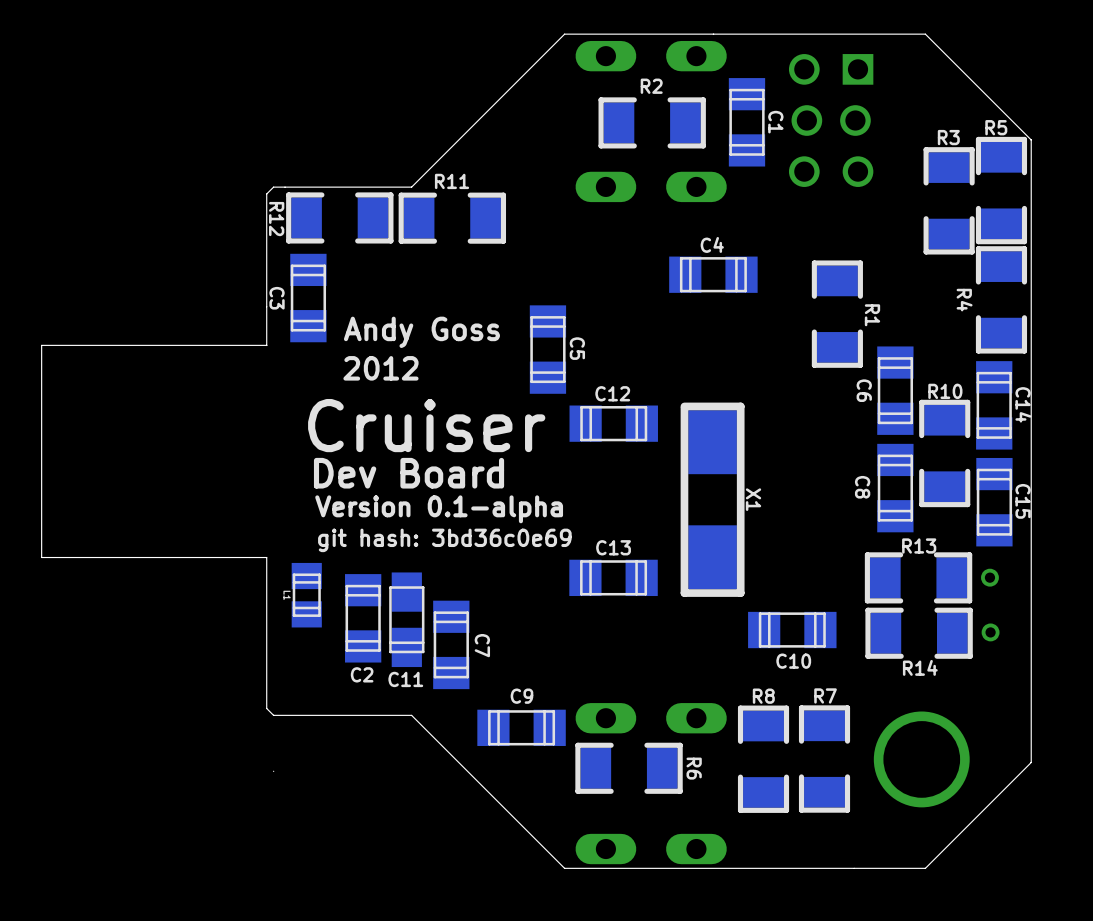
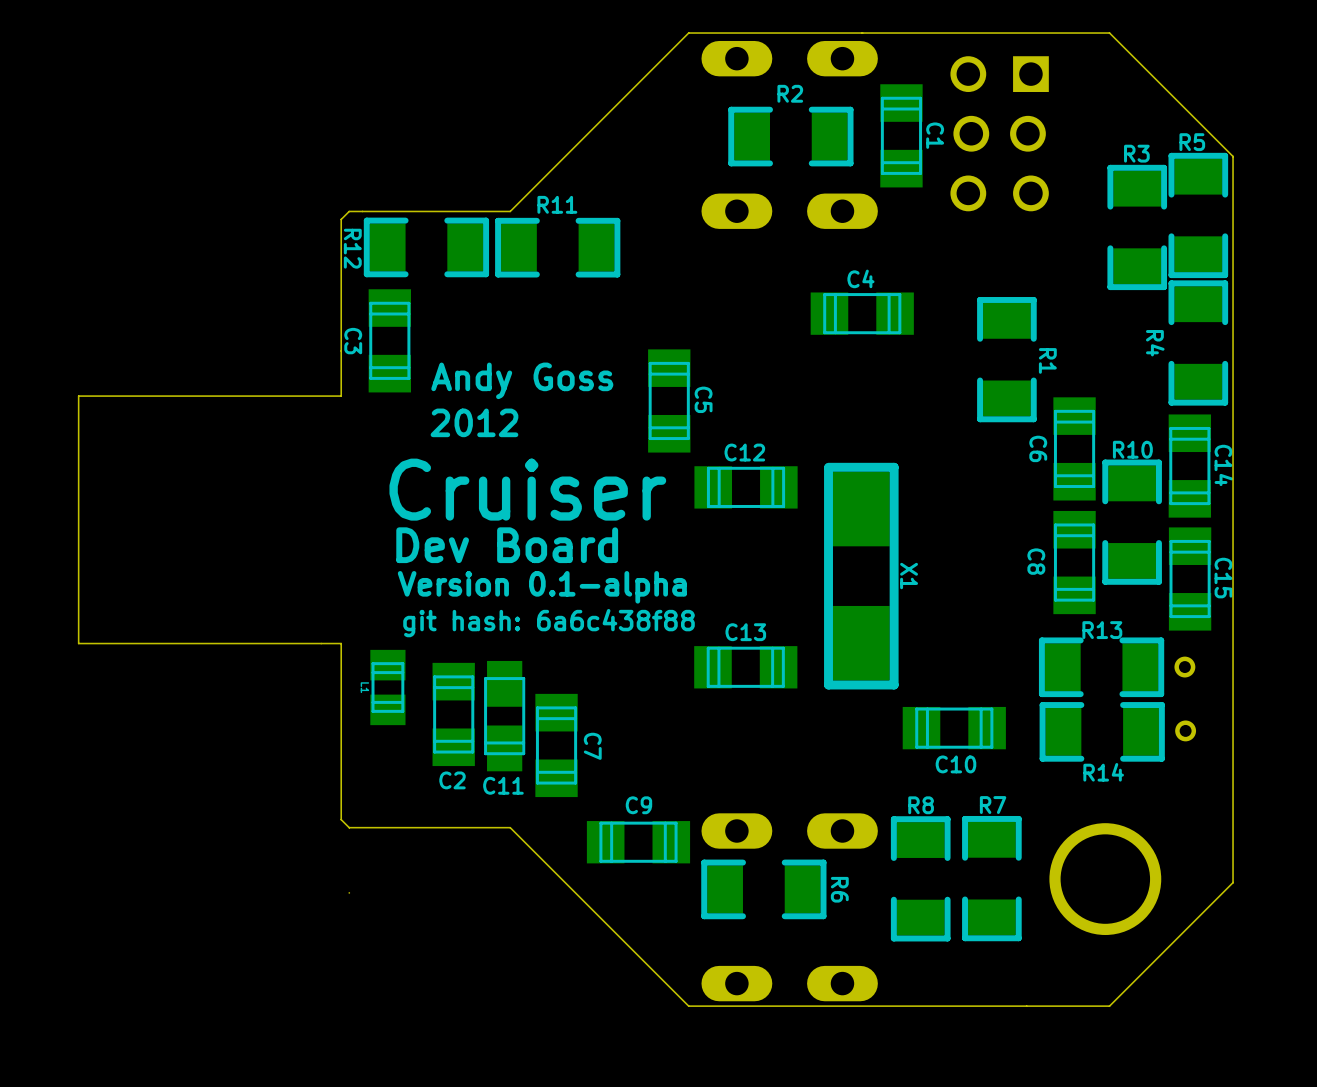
text: git hash: 3bd36c0e69 (444, 540) -> git hash: 6a6c438f88 (549, 623)

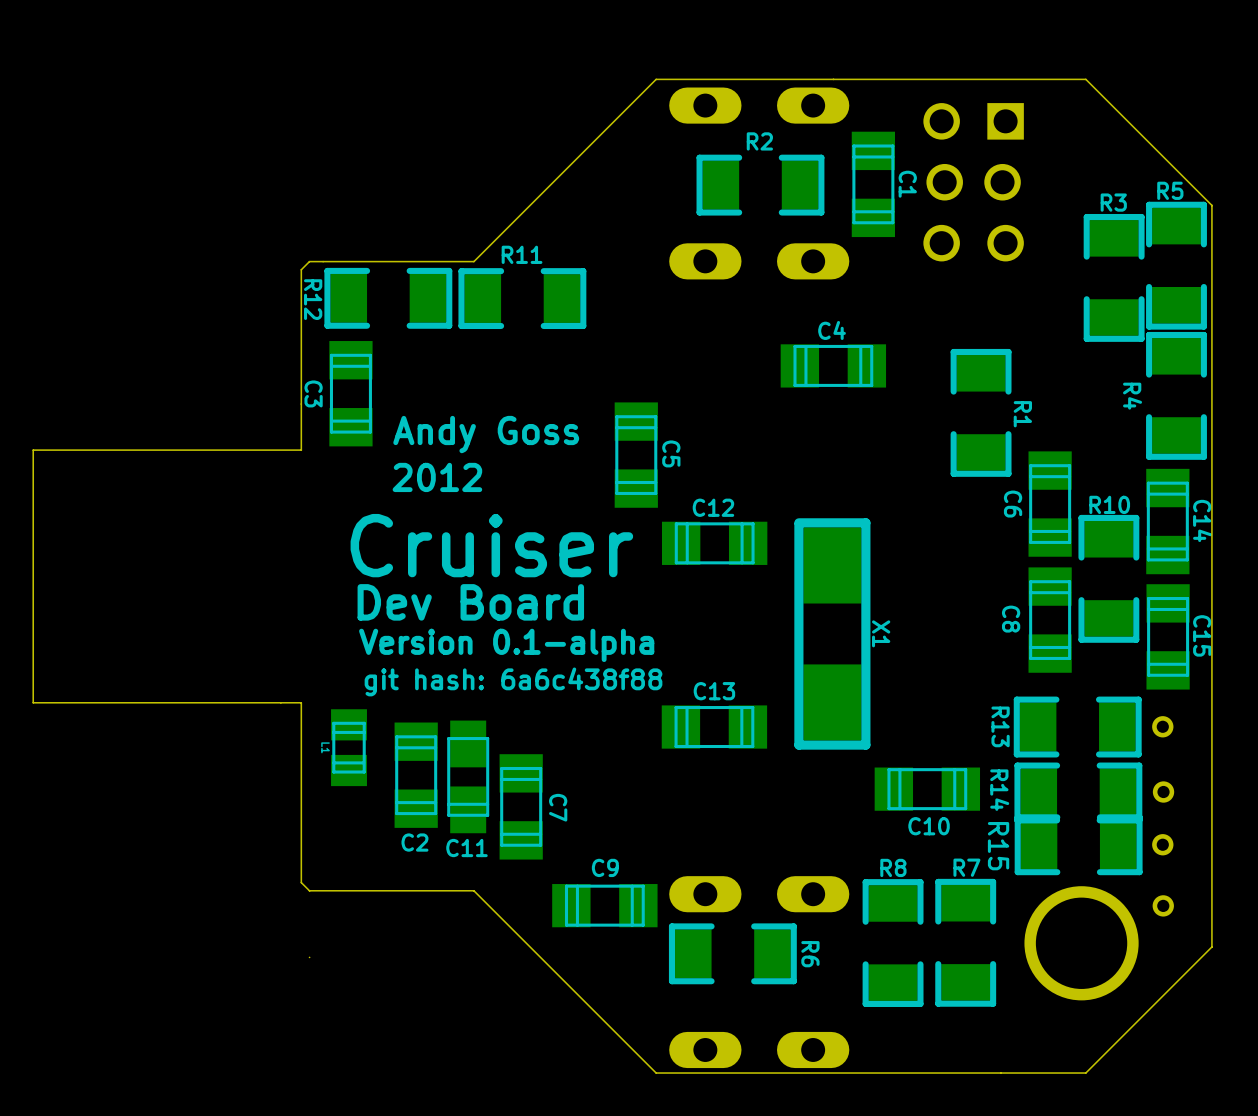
R13 name rotation: 0° (1102, 630) -> 90° clockwise (1000, 726)
R13 name position: R13 (1102, 630) -> R13 (1000, 726)
R14 name rotation: 0° (1103, 772) -> 90° clockwise (999, 790)
R14 name position: R14 (1103, 772) -> R14 (999, 790)
R15: none -> (1078, 844)
part: none -> (1162, 844)
part: none -> (1163, 905)

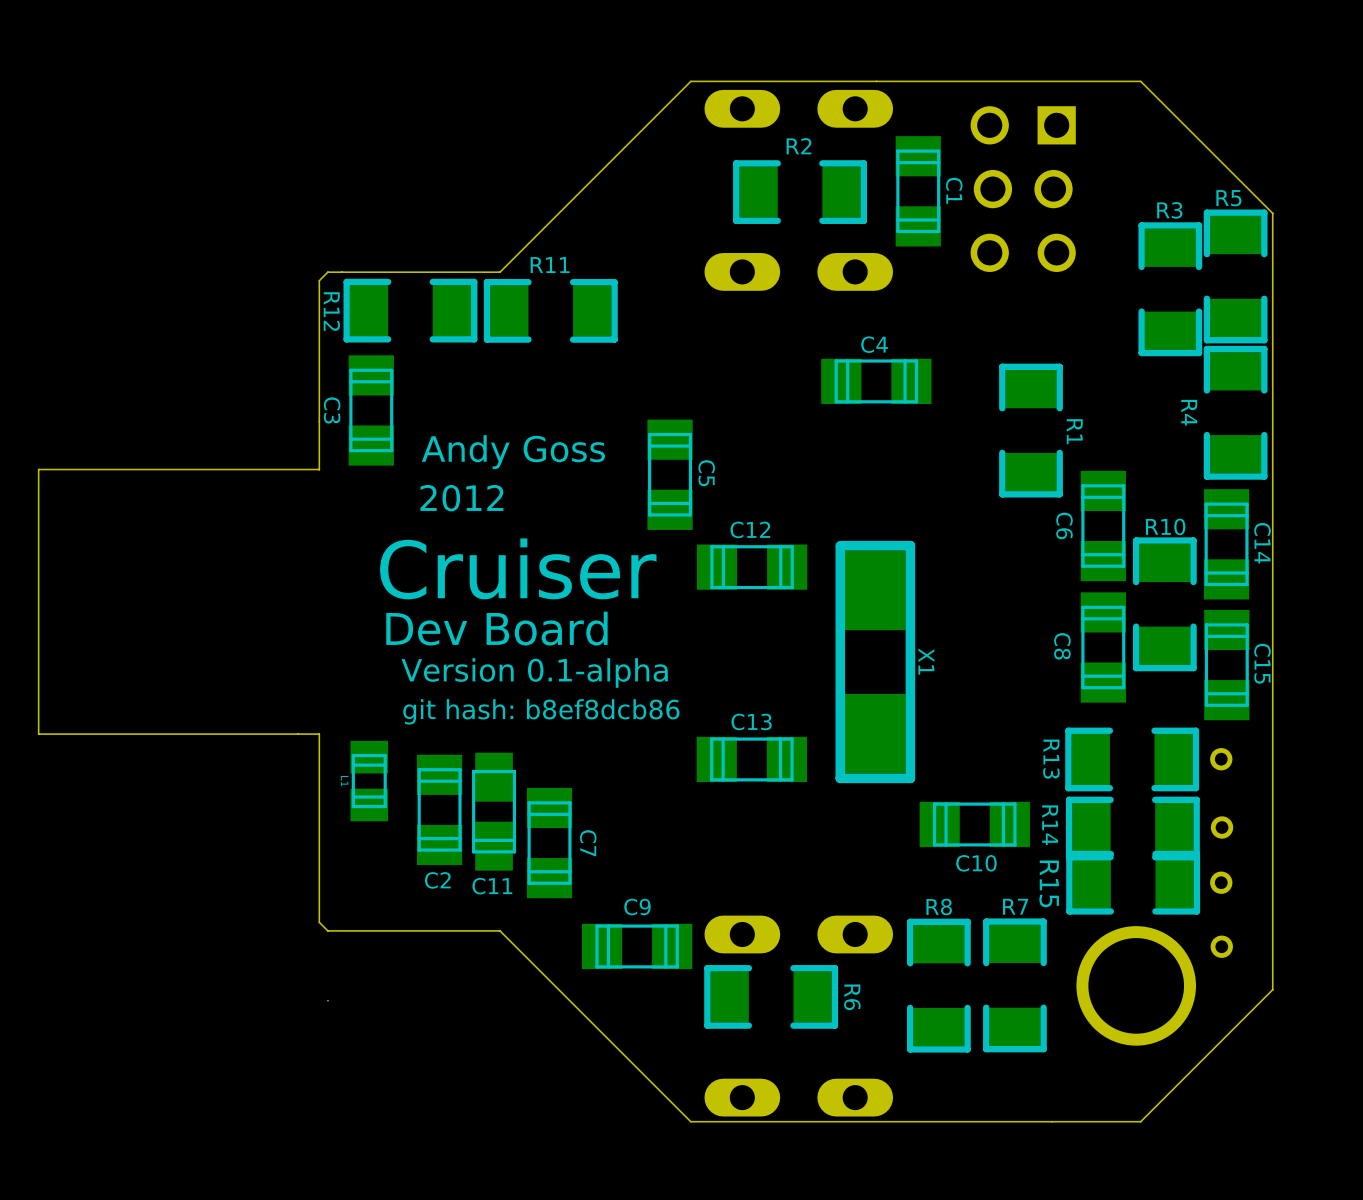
text: git hash: 6a6c438f88 (513, 681) -> git hash: b8ef8dcb86 (541, 711)

